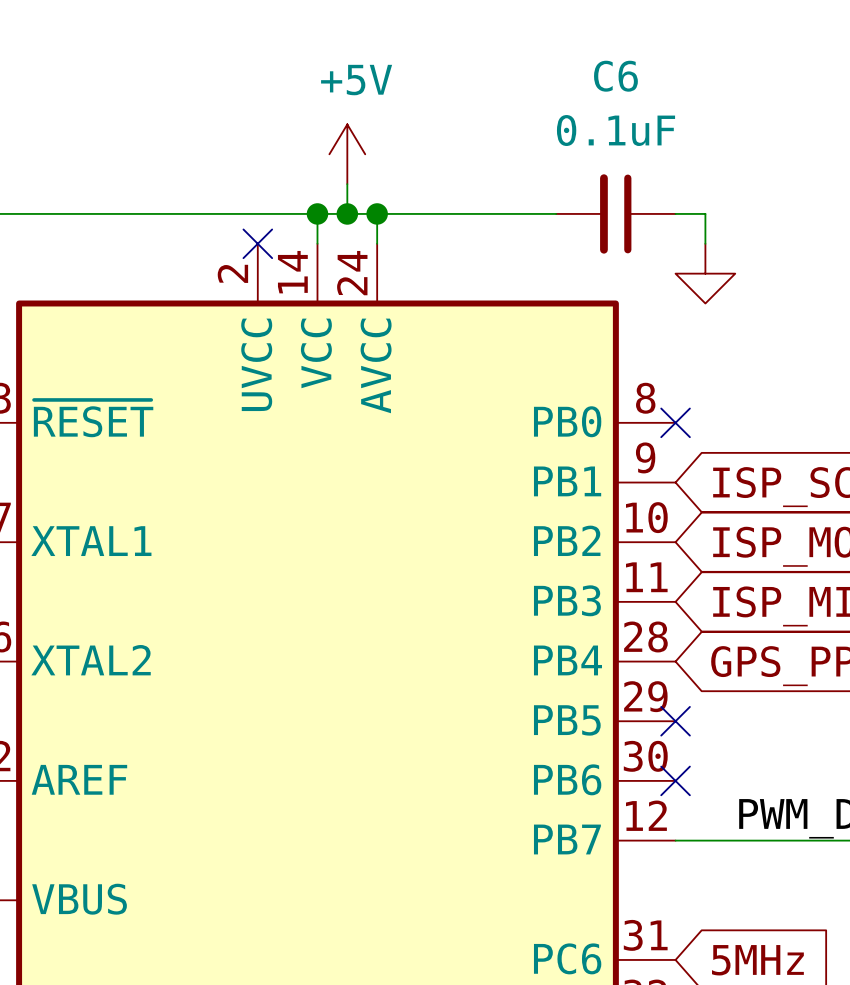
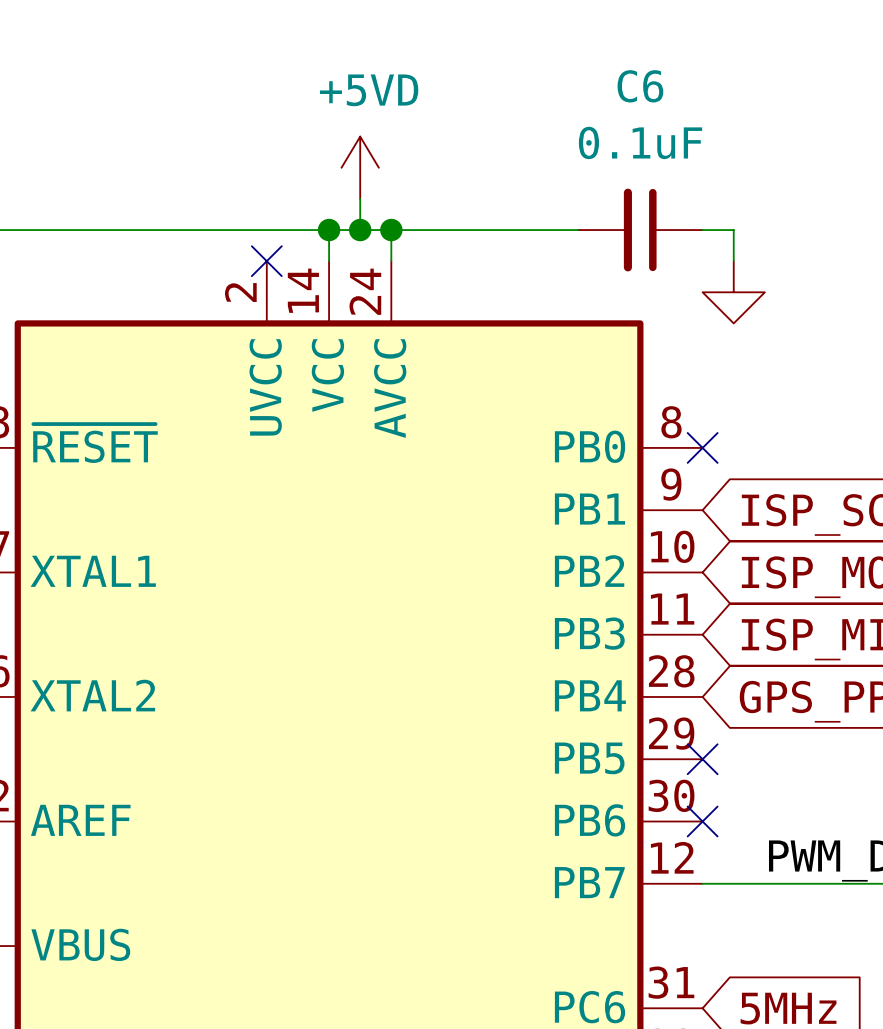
power symbol: +5V (347, 154) -> +5VD (360, 167)

